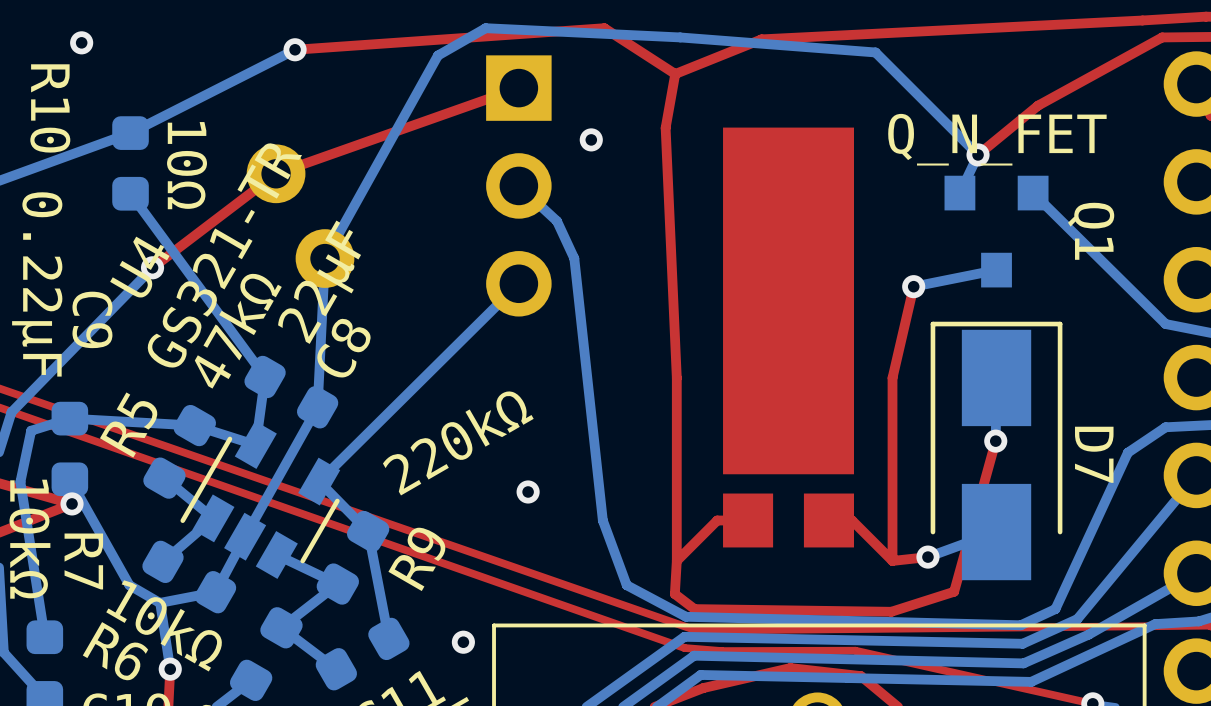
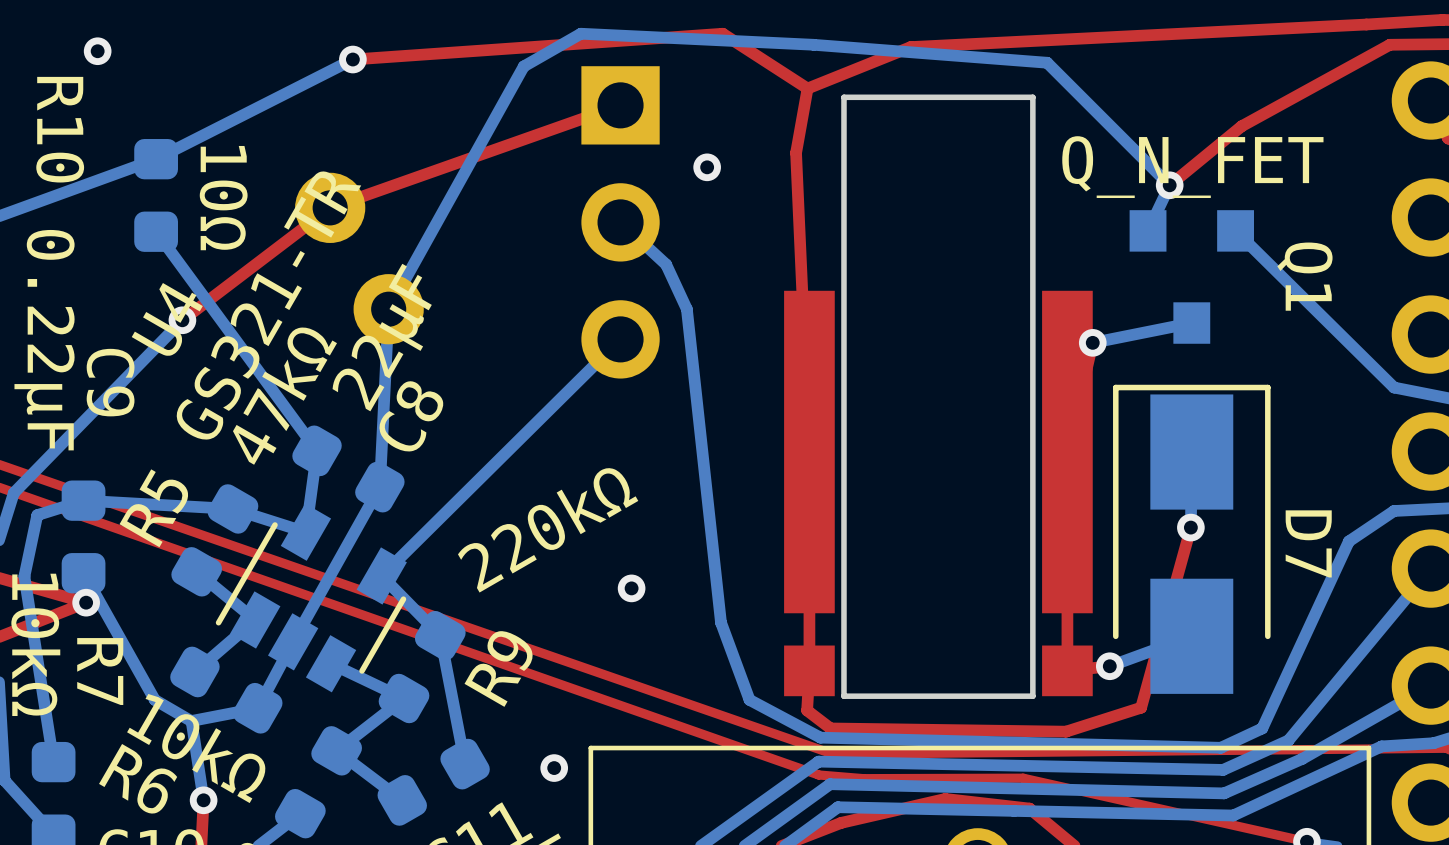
part footprint: [723, 127, 854, 548] -> [784, 94, 1093, 699]
top track: (748, 520) (717, 520) (676, 560) -> none
top track: (828, 520) (852, 520) (892, 560) -> none

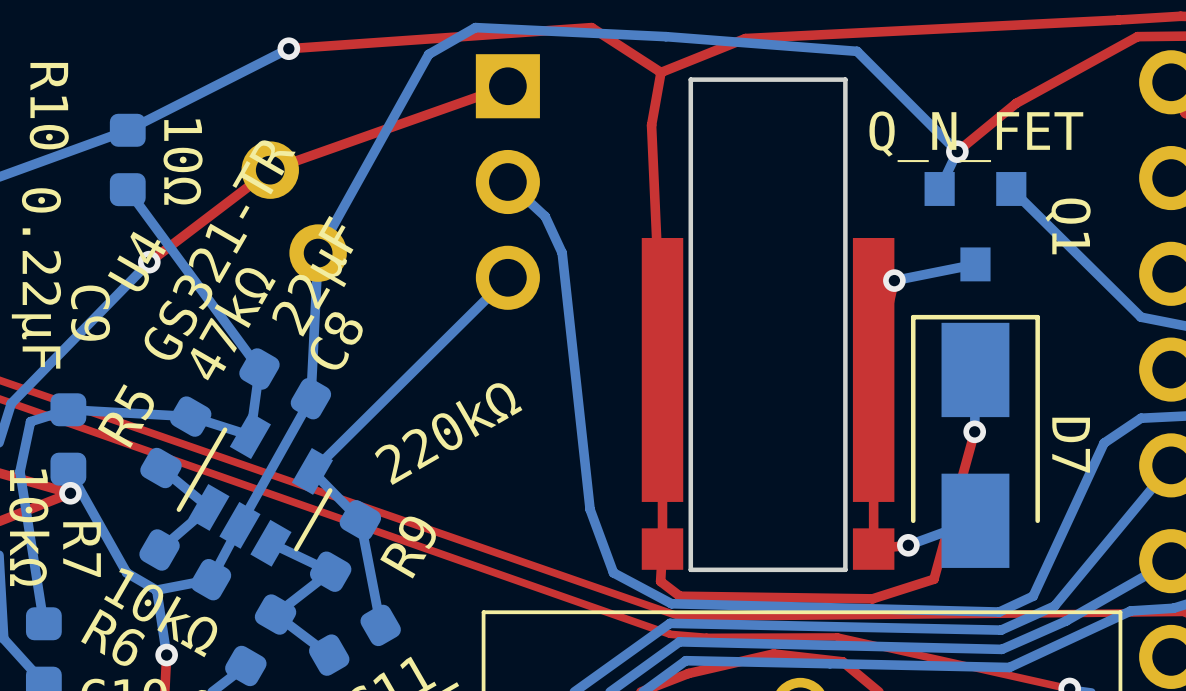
via: (97, 51) -> none
via: (707, 167) -> none
via: (631, 588) -> none
via: (554, 768) -> none

